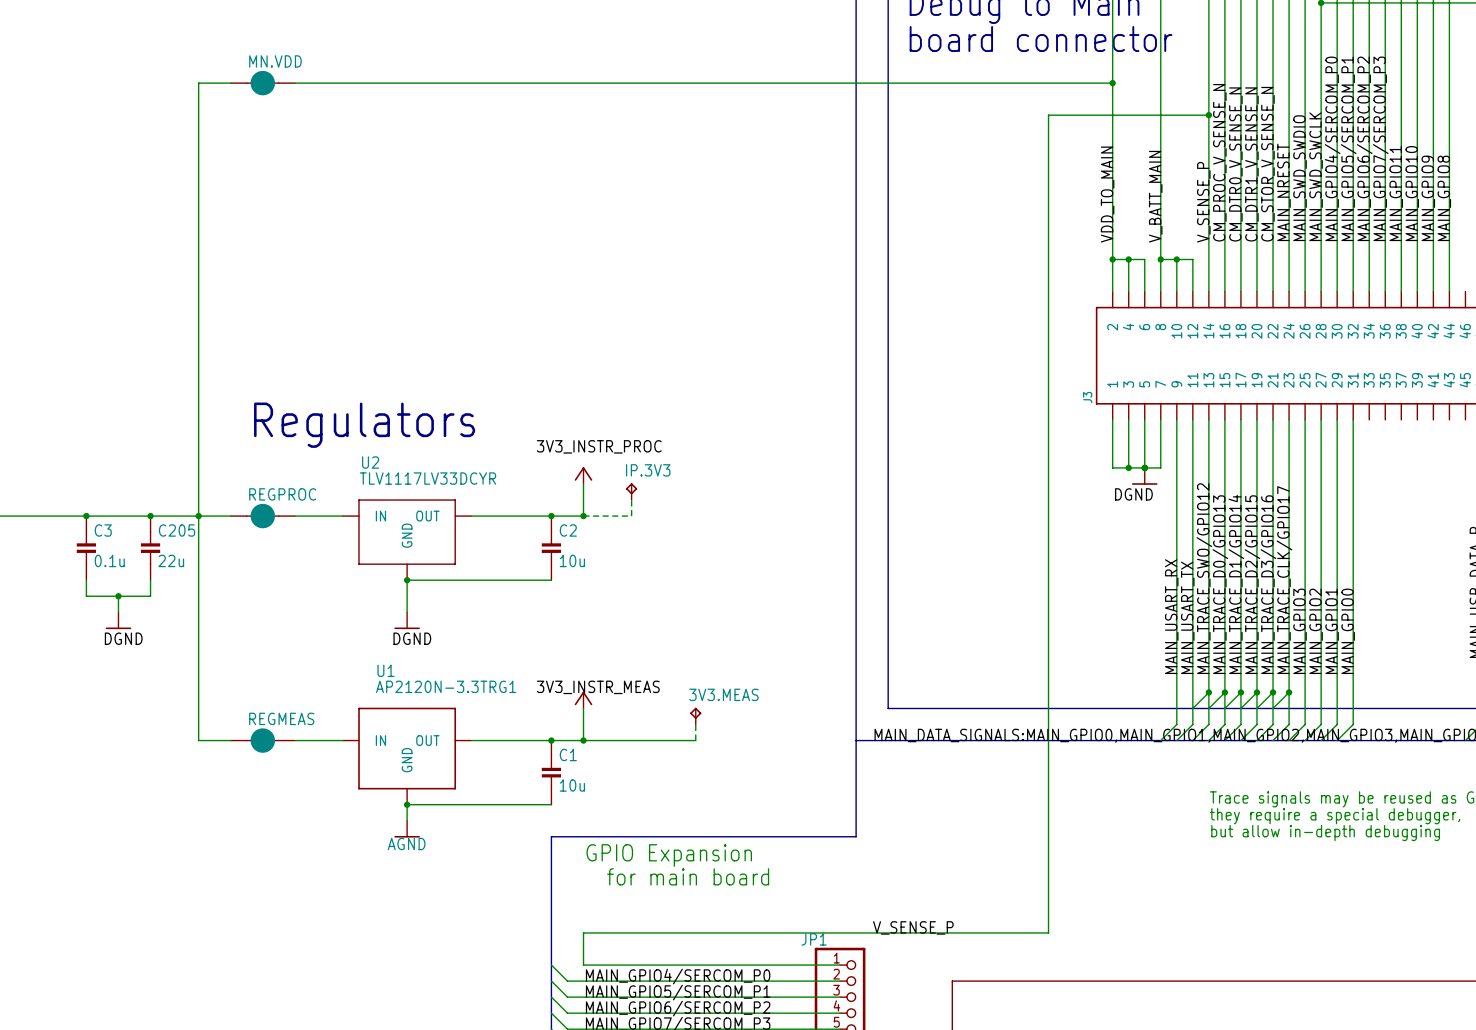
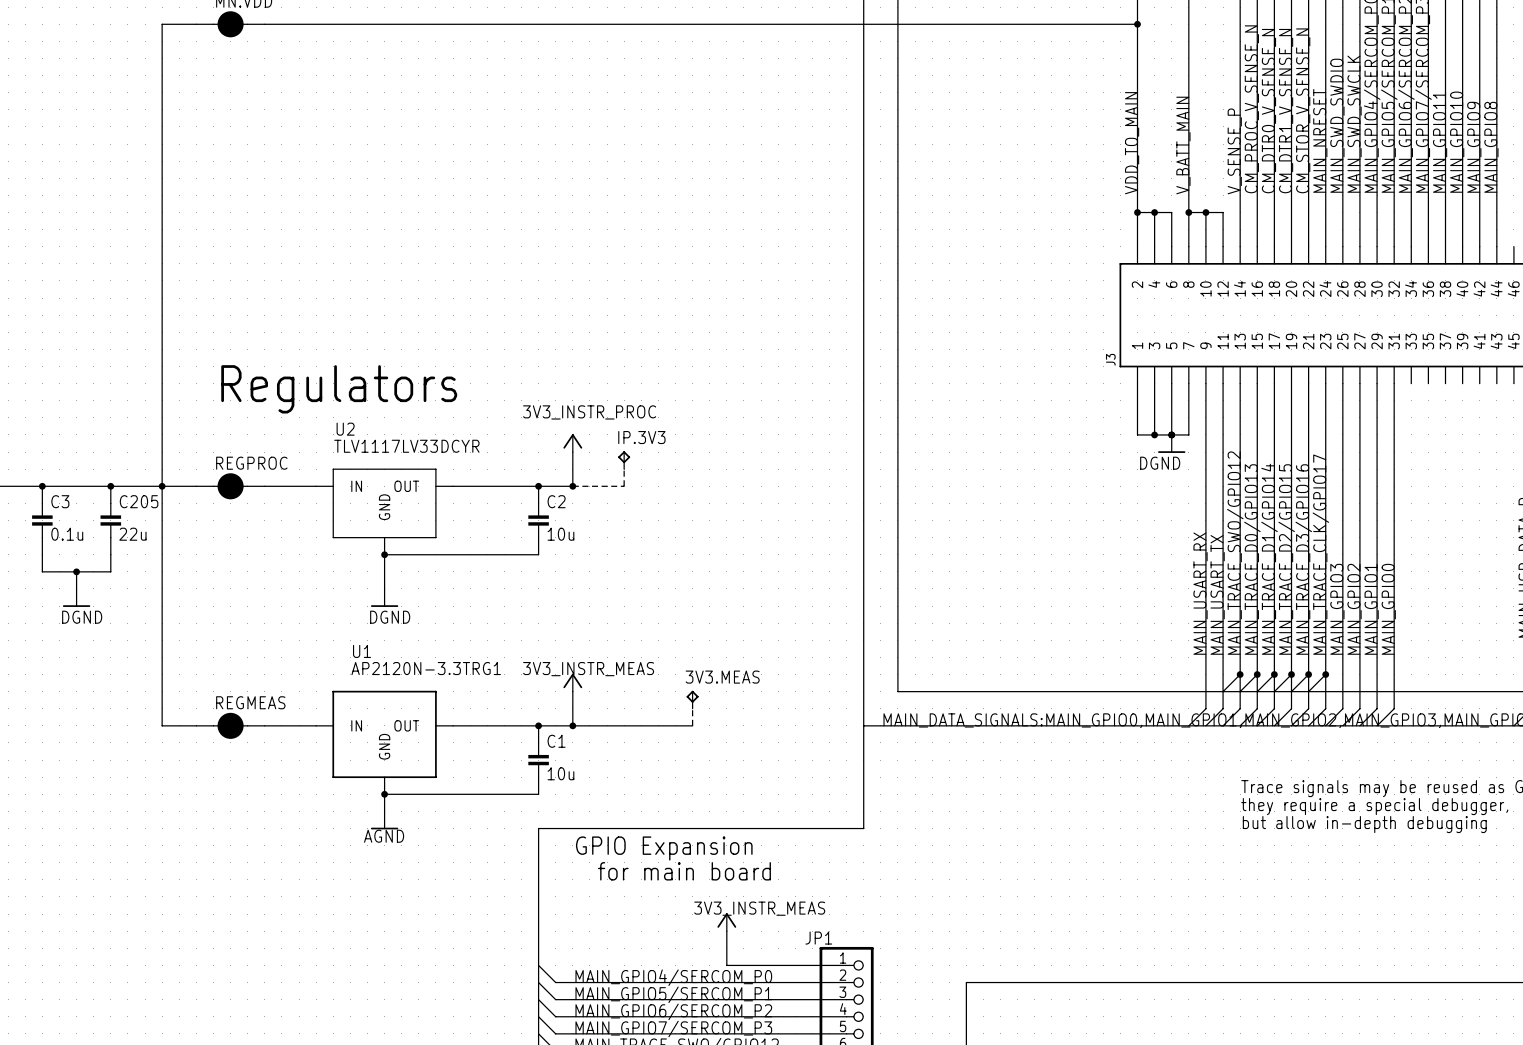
wire: (1208, 115) (1048, 115) (1048, 932) (583, 932) (583, 965) (727, 965) -> (726, 931) (726, 965)
junction: (1208, 115) -> none
label: none -> 3V3_INSTR_MEAS (759, 908)
power symbol: none -> (726, 922)
label: V_SENSE_P (913, 927) -> none

